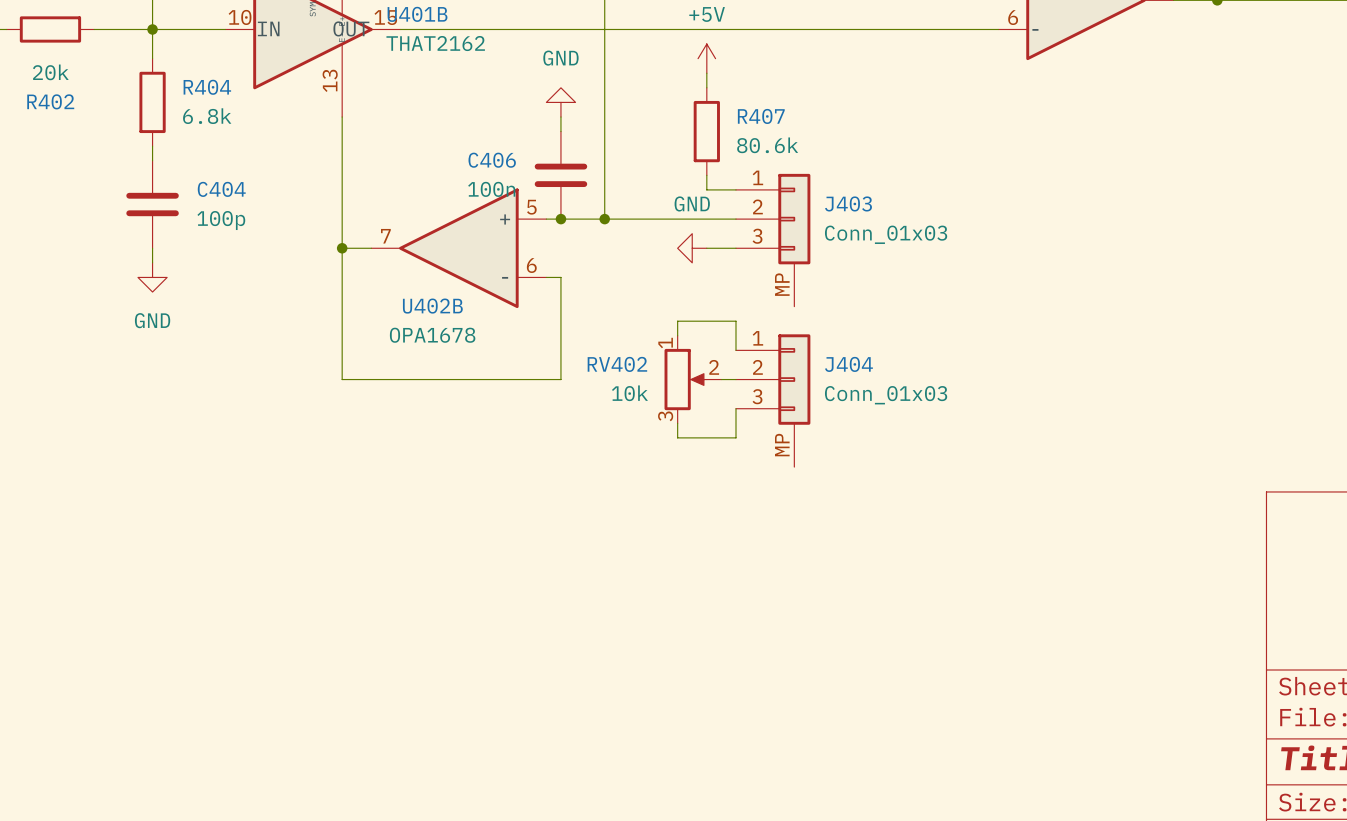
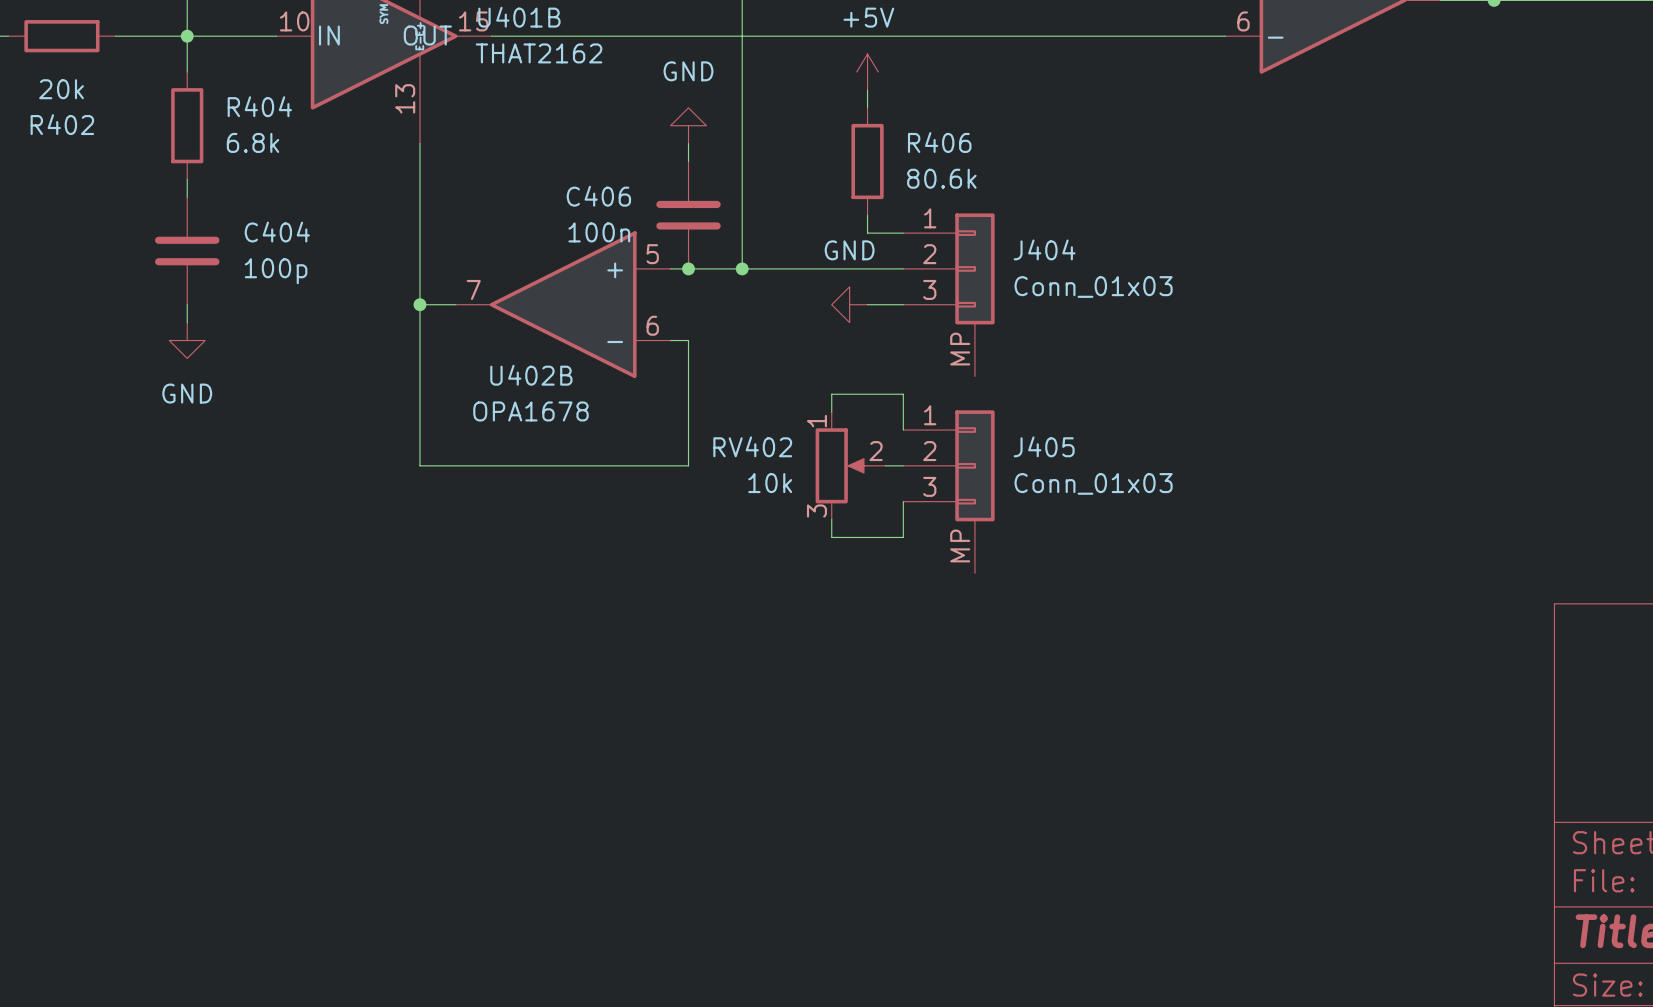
R407 name: R407 (761, 116) -> R406 (939, 142)
J403 name: J403 (848, 203) -> J404 (1044, 249)
J404 name: J404 (848, 364) -> J405 (1044, 446)

